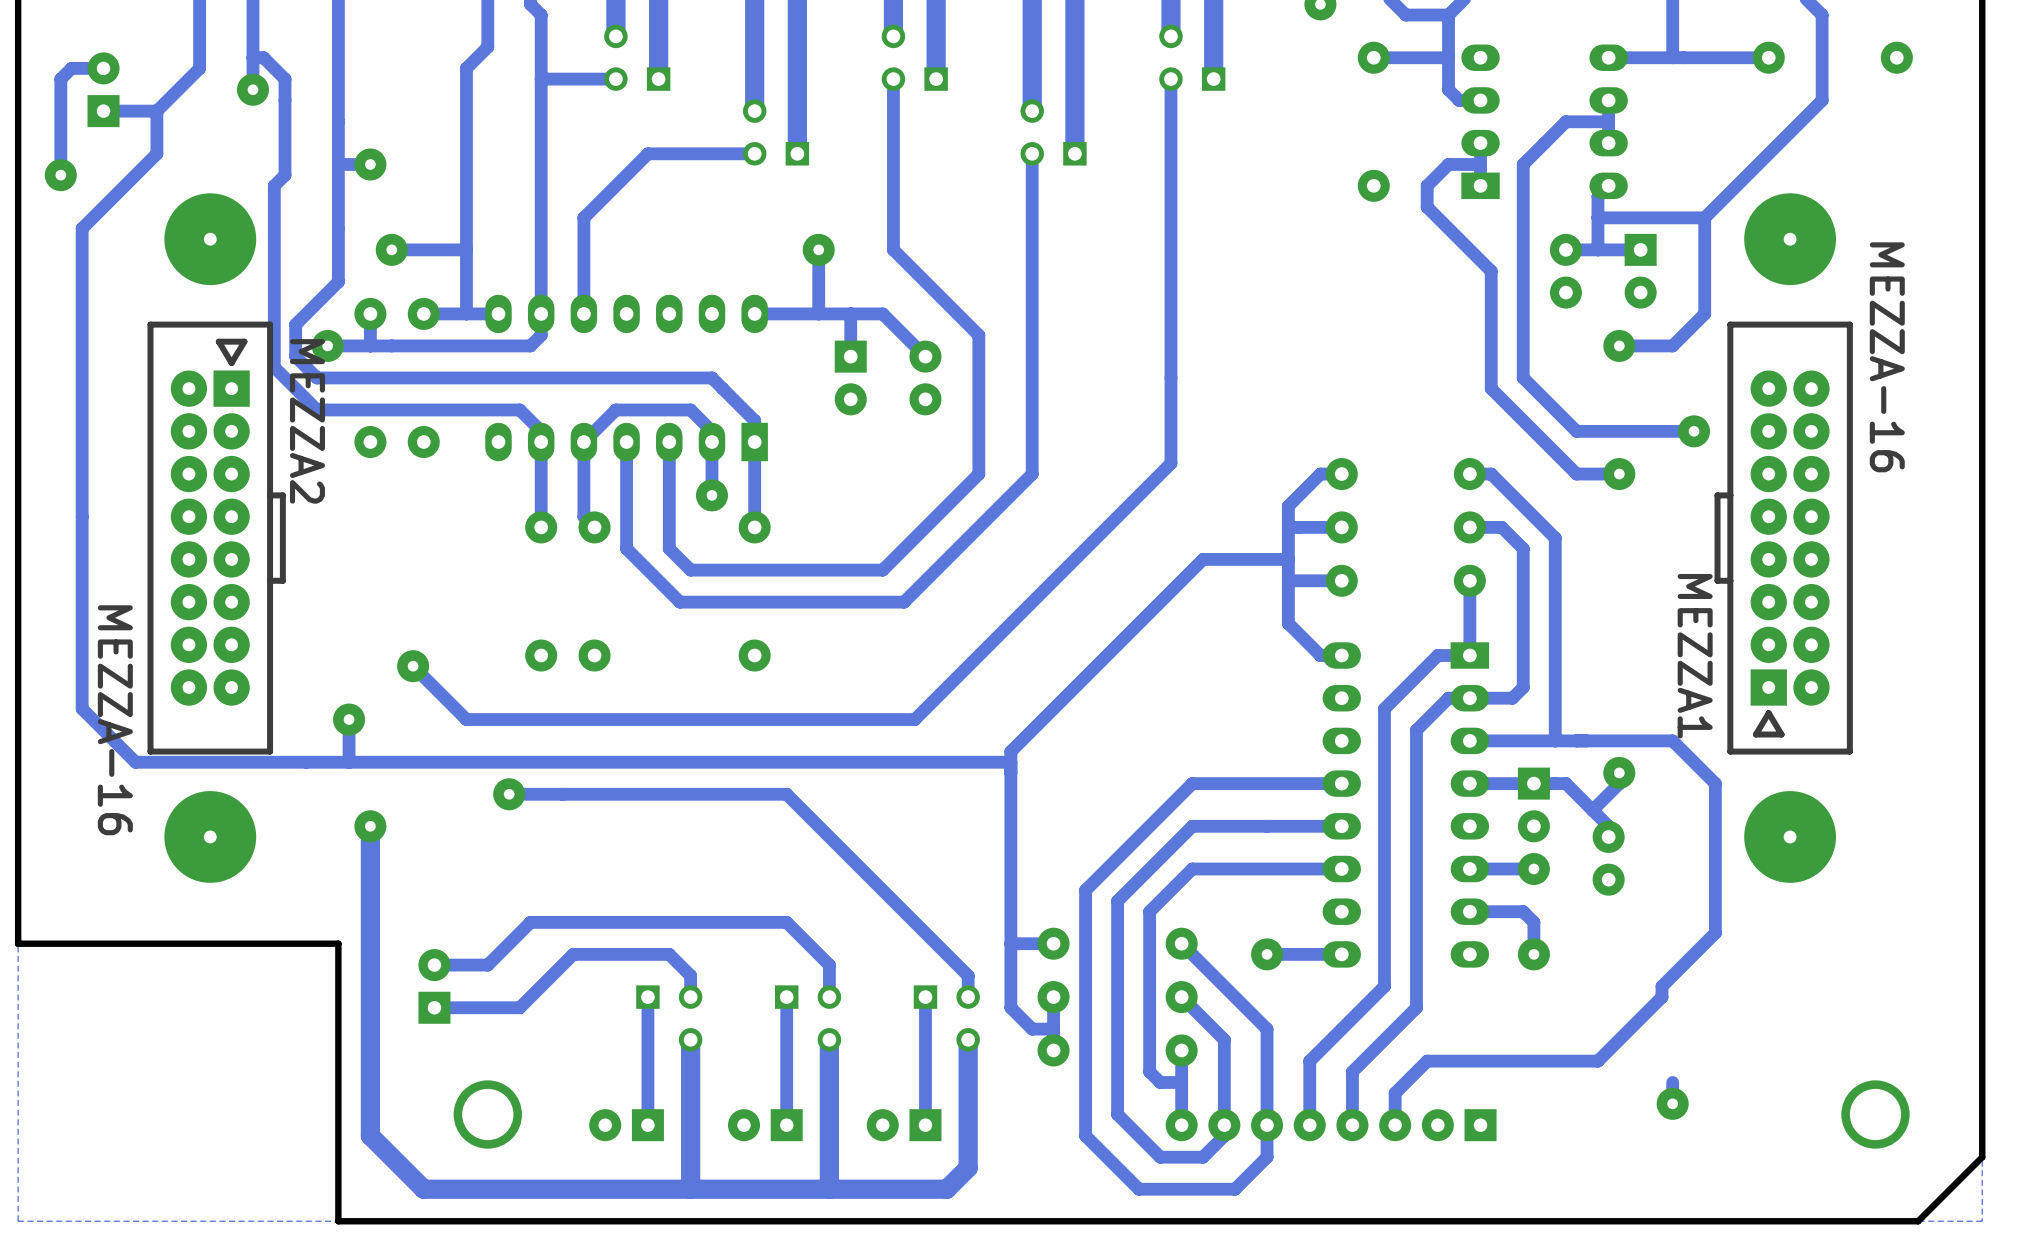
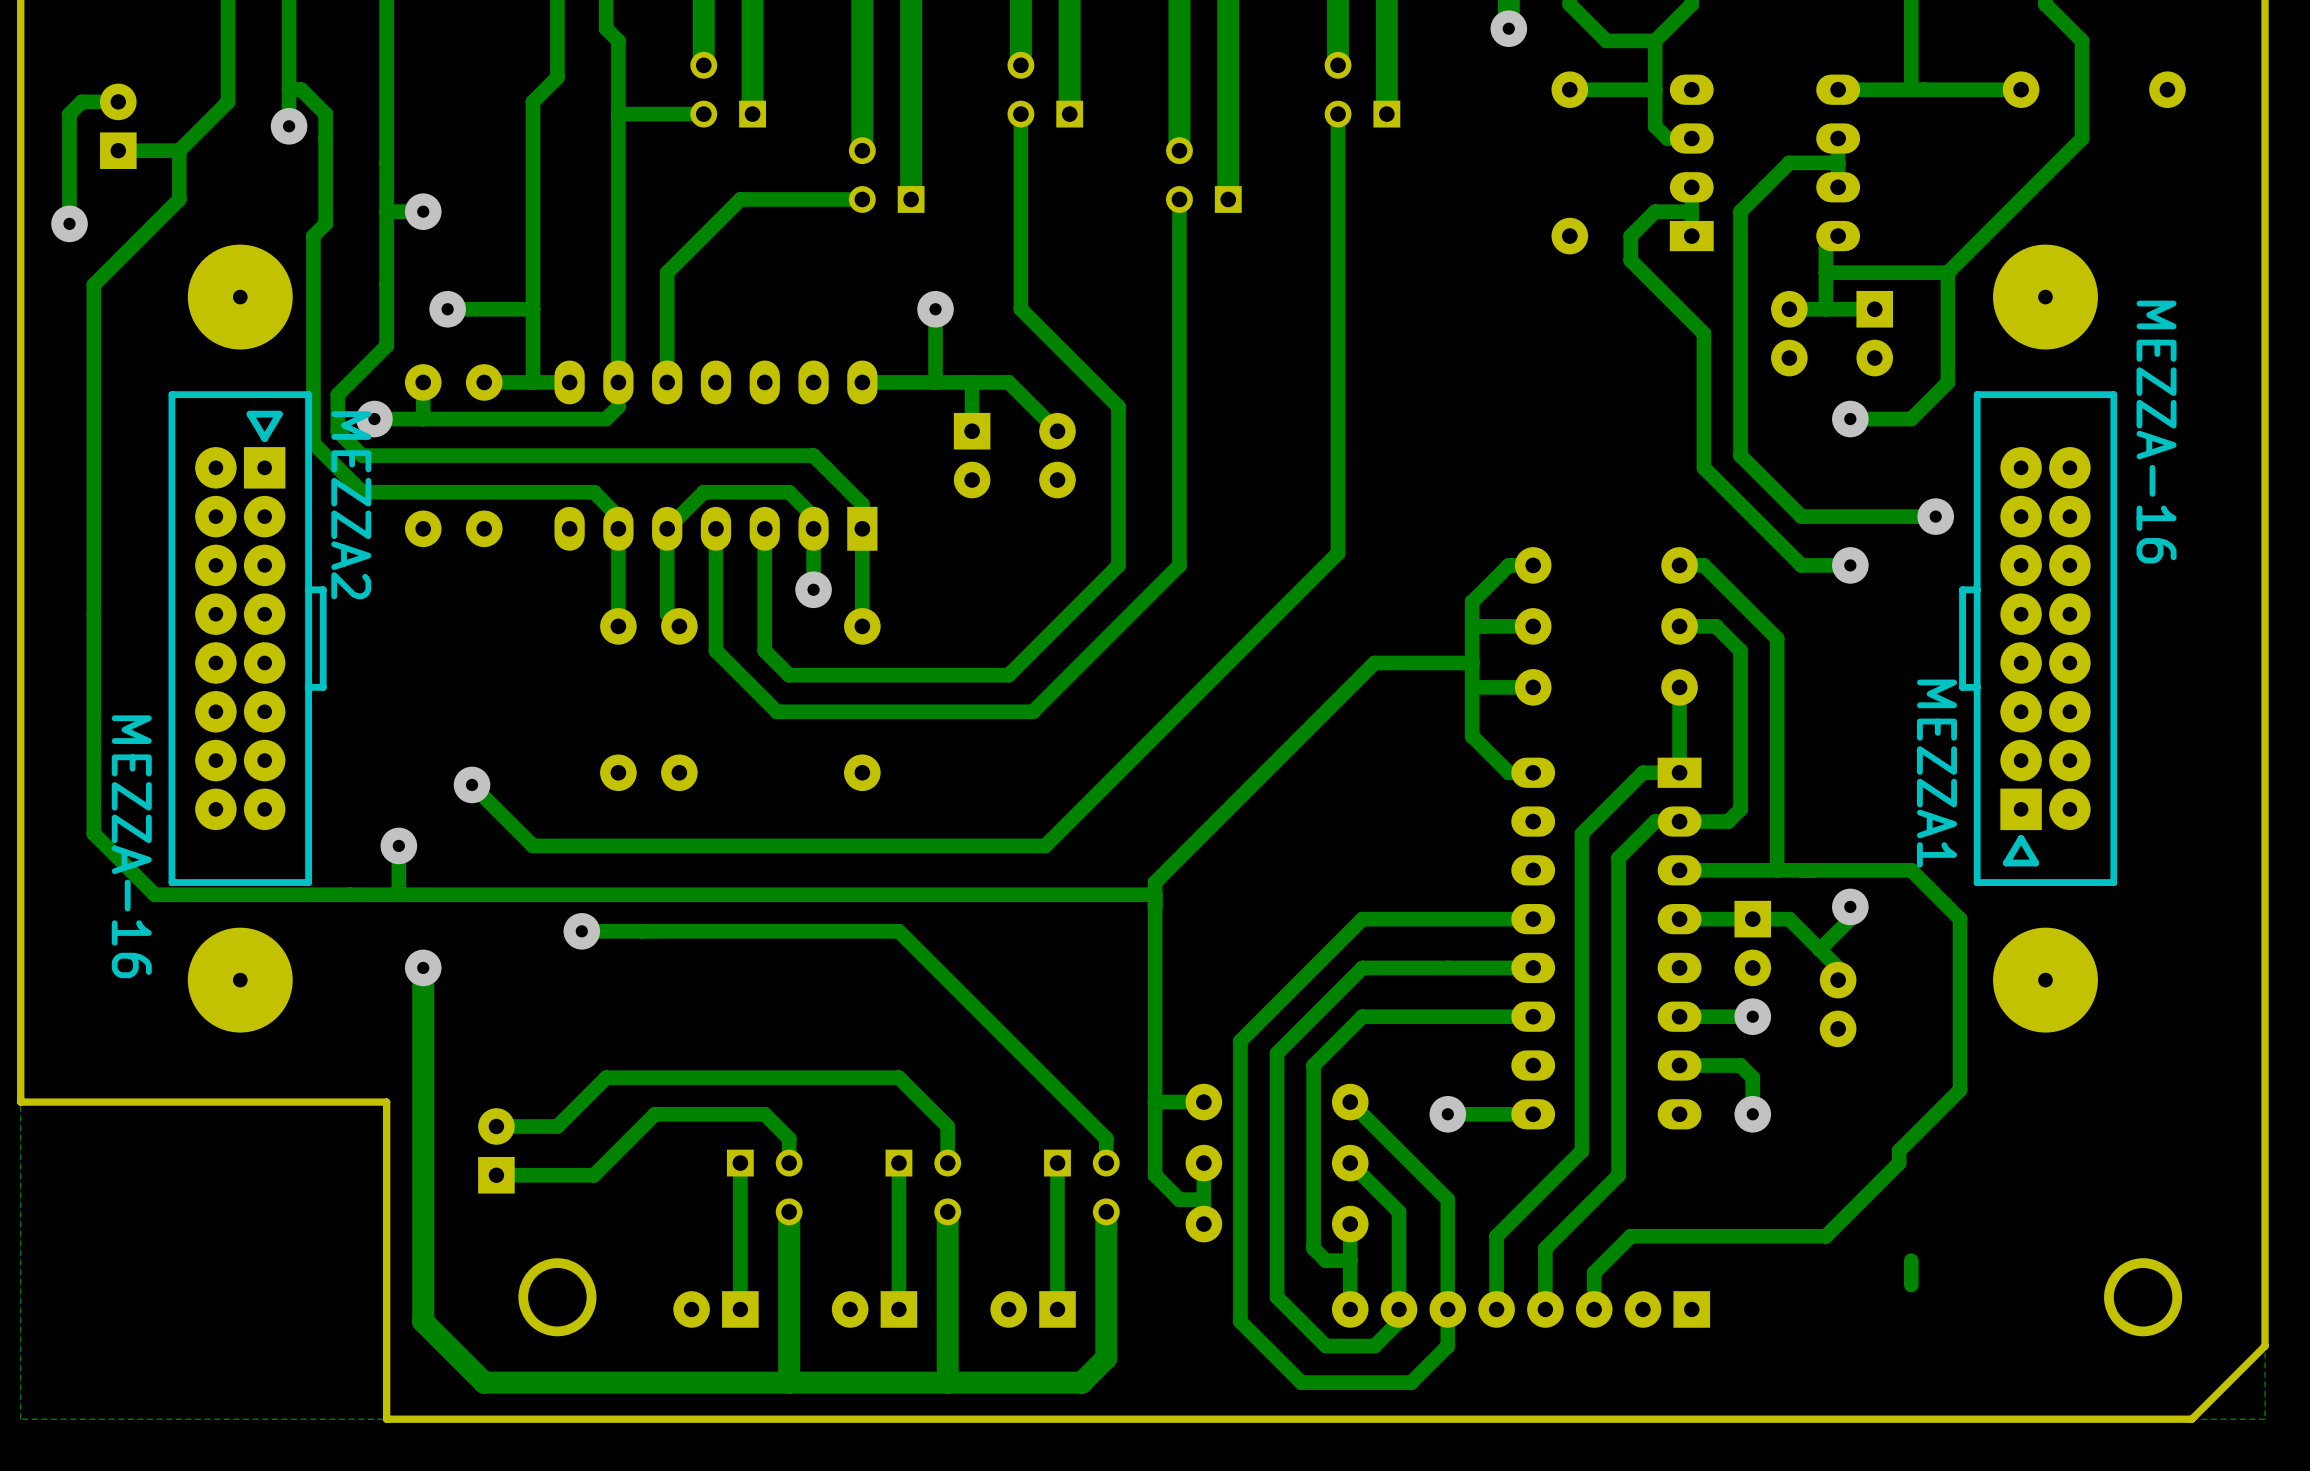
via: (1672, 1103) -> none

